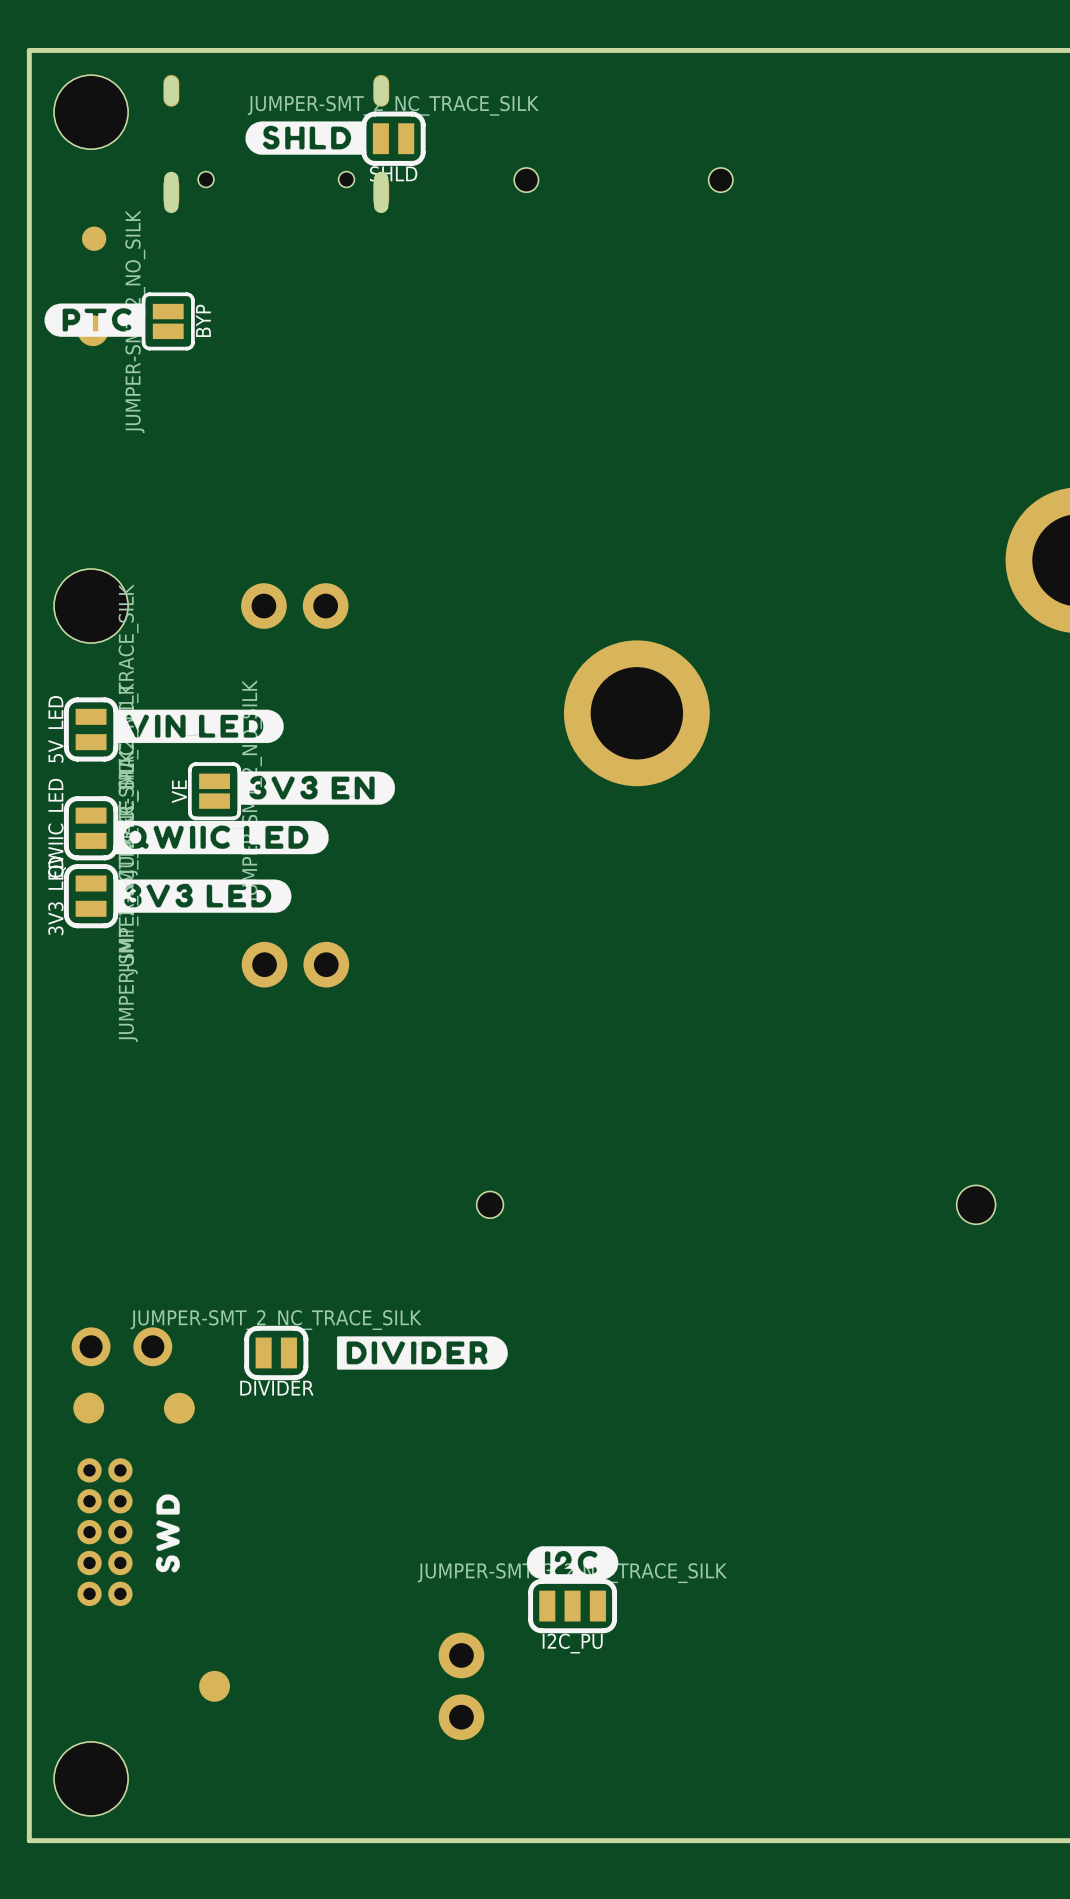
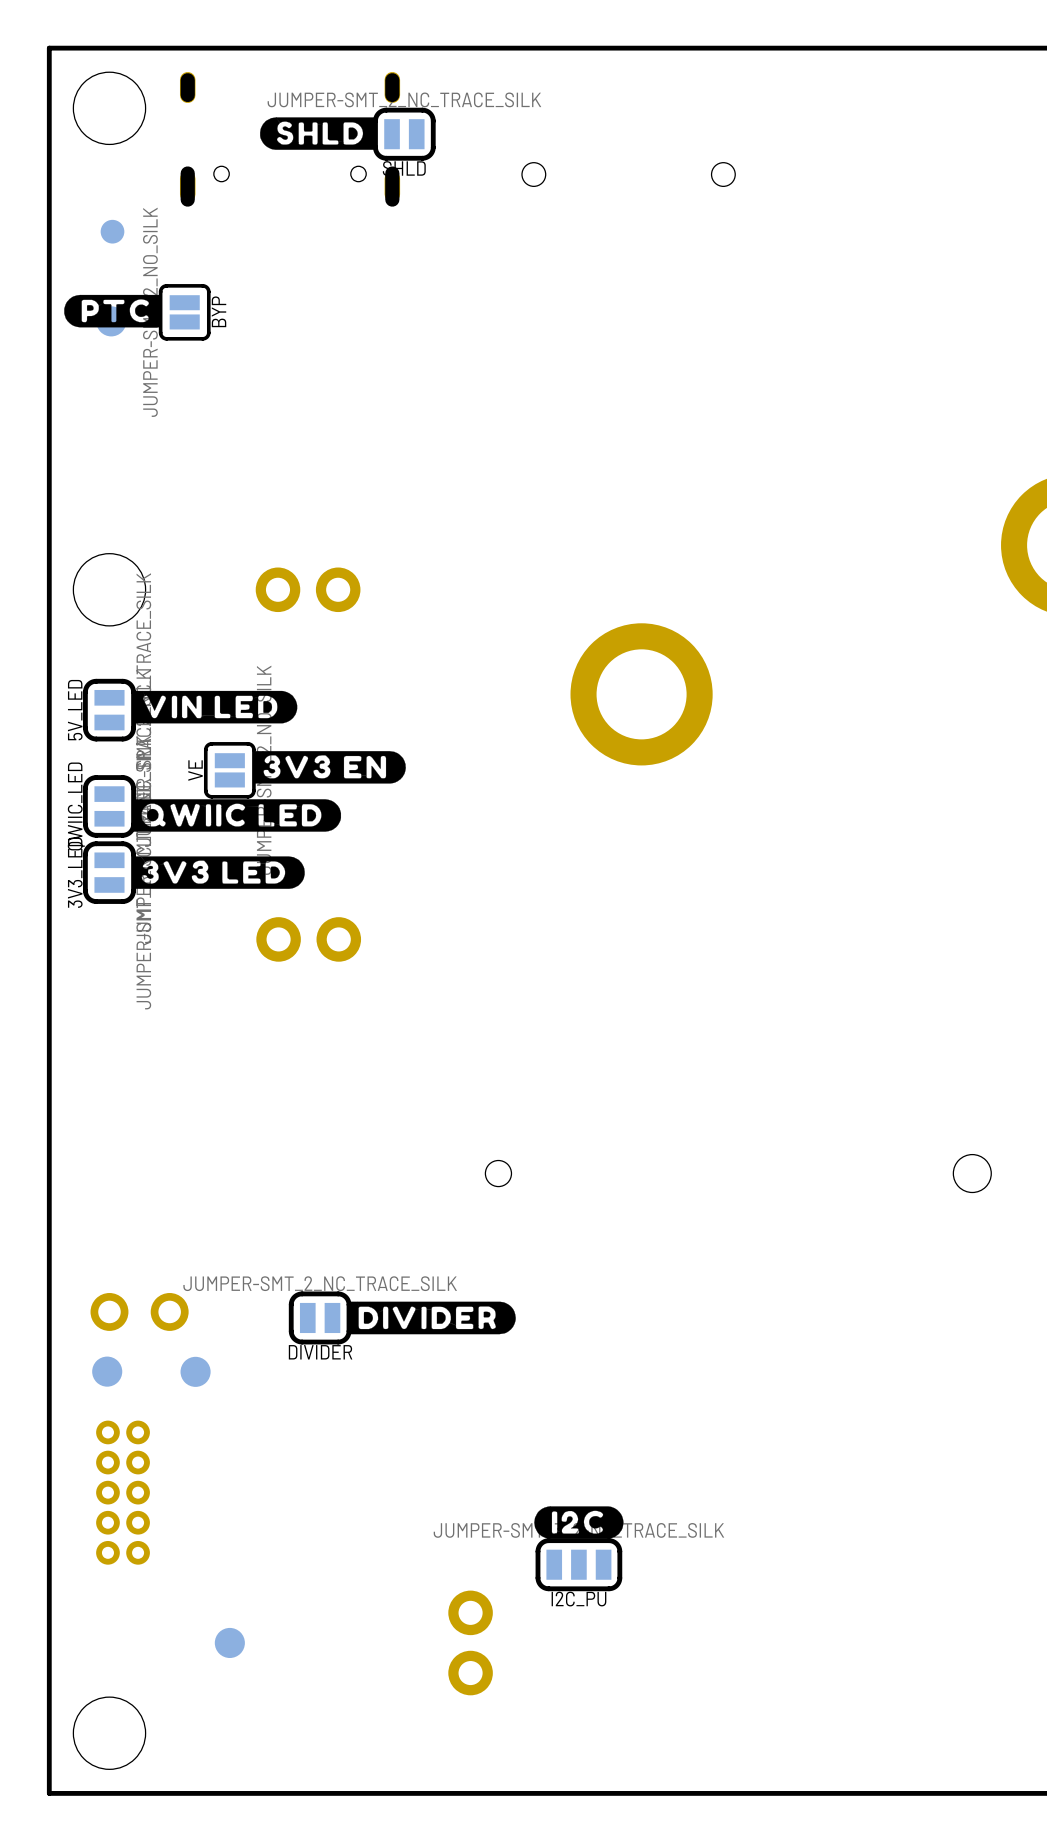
DIVIDER position: (276, 1352) -> (320, 1317)
drawing: [155, 1494, 180, 1573] -> none

